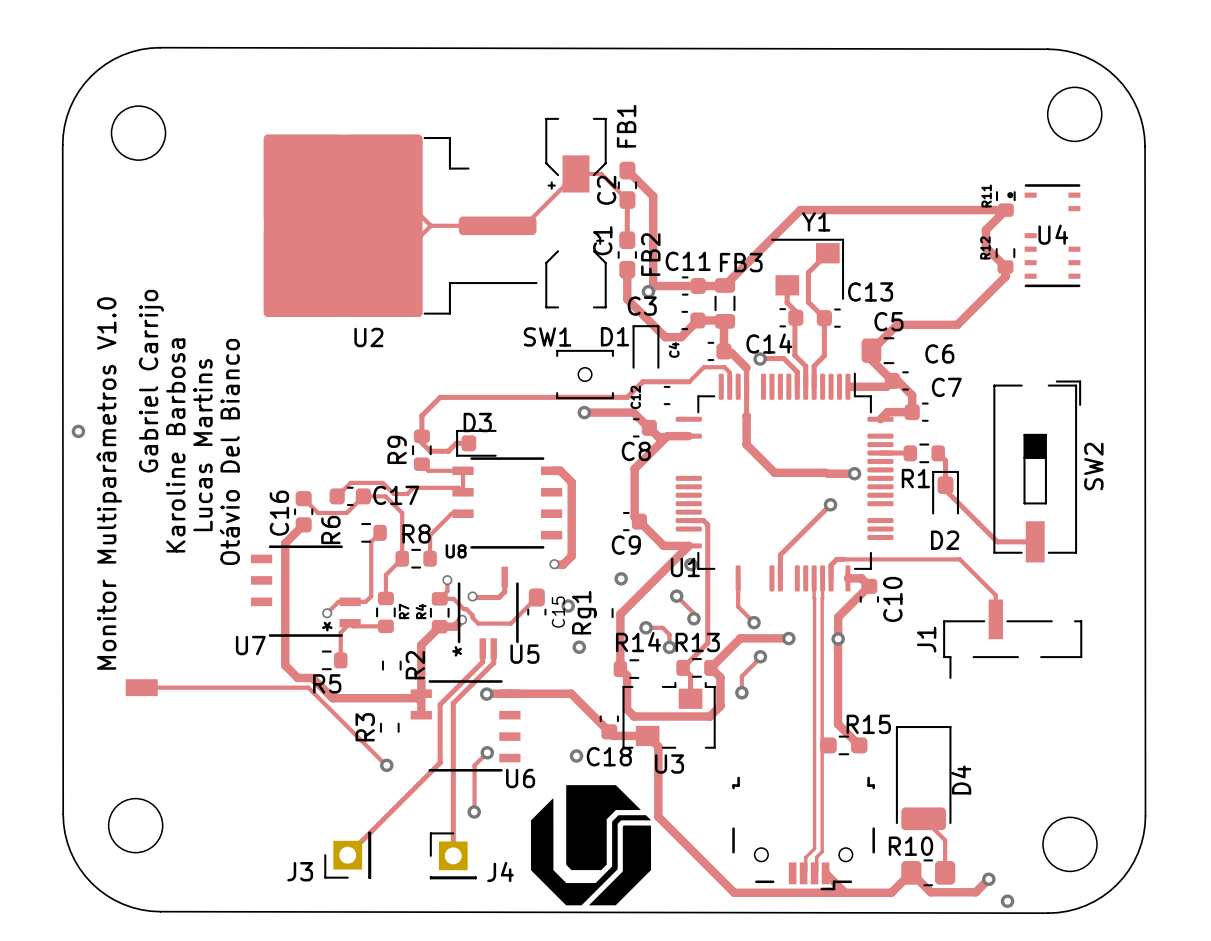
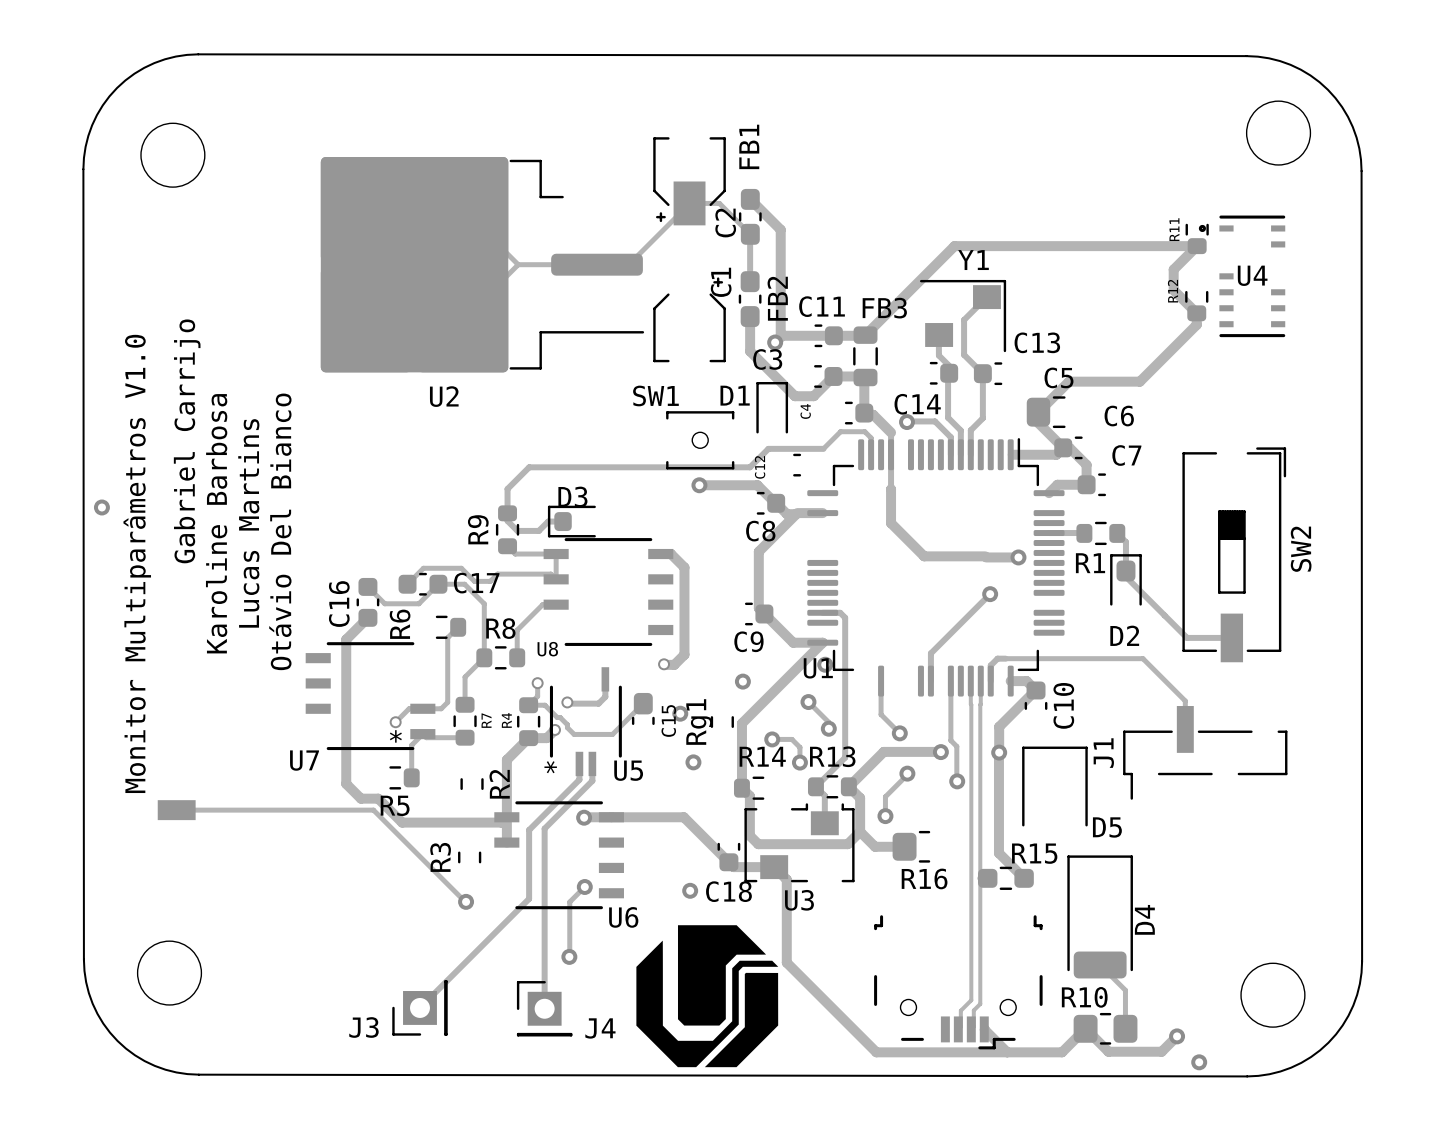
track: none -> (950, 681) (950, 740) (956, 746) (956, 781)
via: none -> (957, 781)
D5: none -> (1054, 786)
track: none -> (860, 831) (875, 846) (904, 846)
R16: none -> (911, 846)

